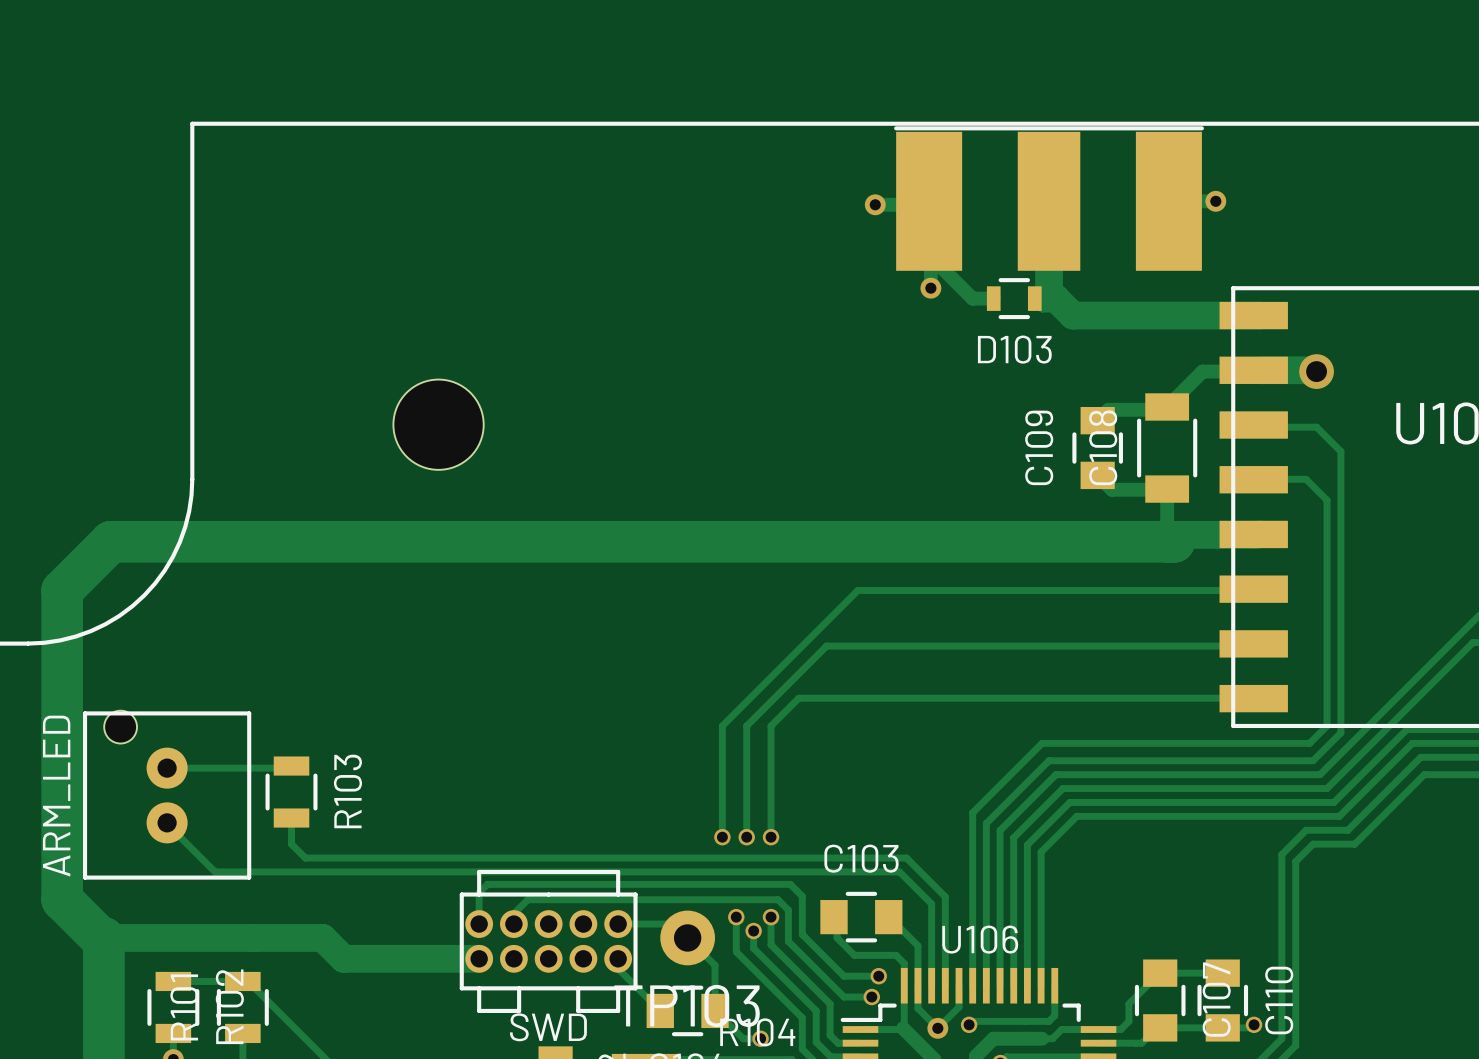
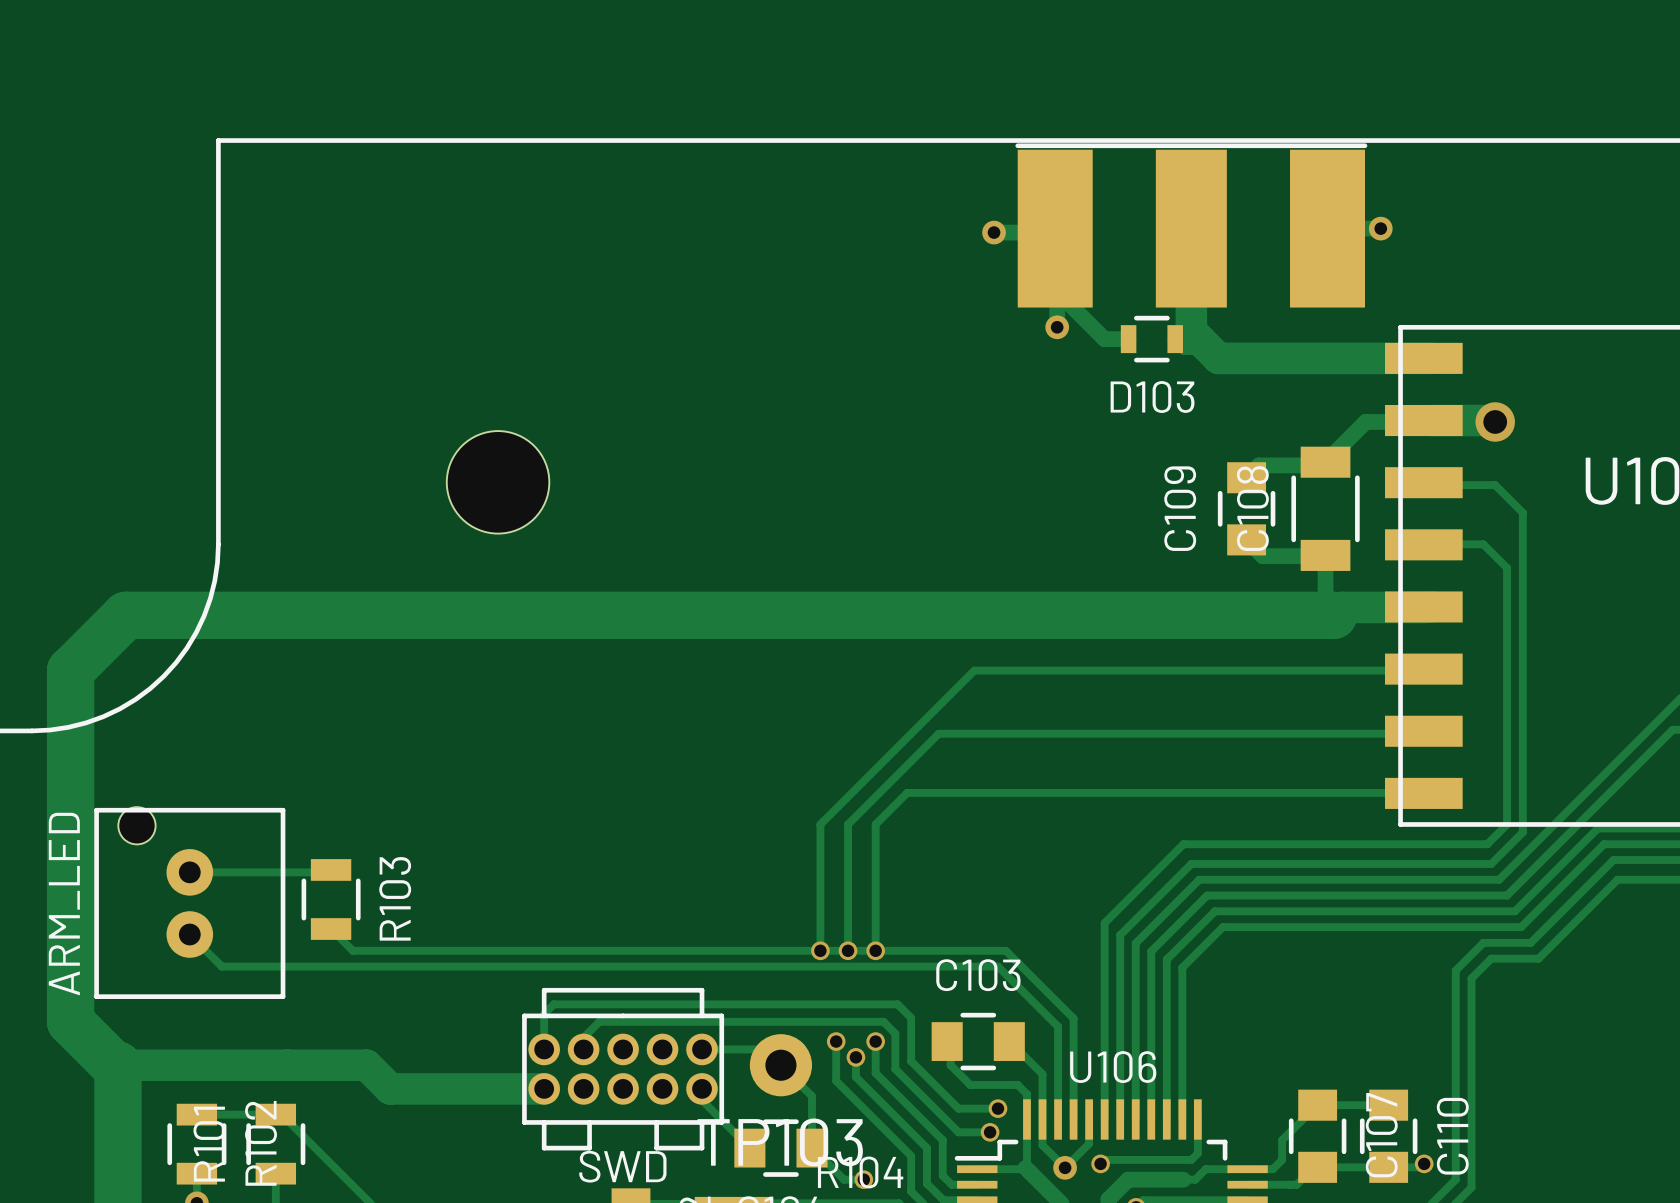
track: (291, 819) (291, 844) (305, 858) (906, 858) -> (331, 929) (352, 950) (1005, 950) (1029, 974)
track: (166, 823) (215, 871) (899, 871) -> (189, 934) (221, 966) (997, 966) (1021, 990)

